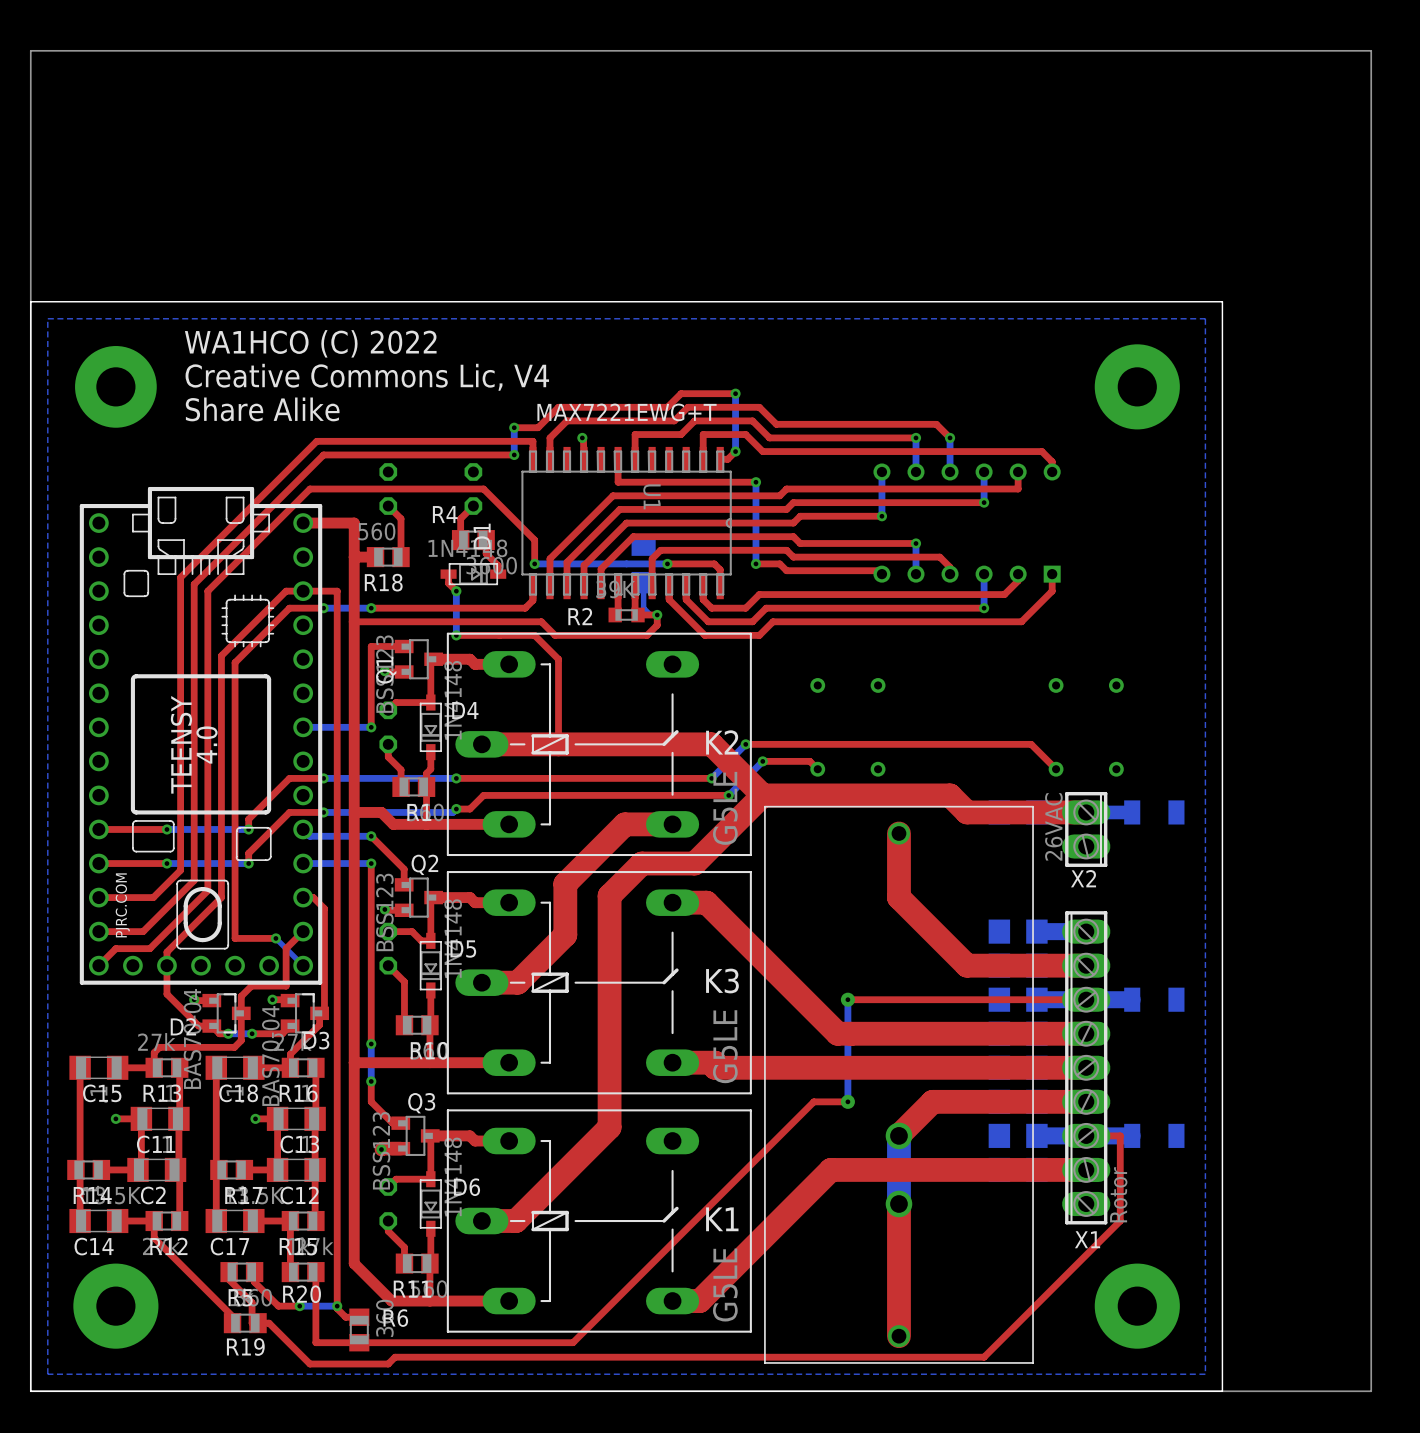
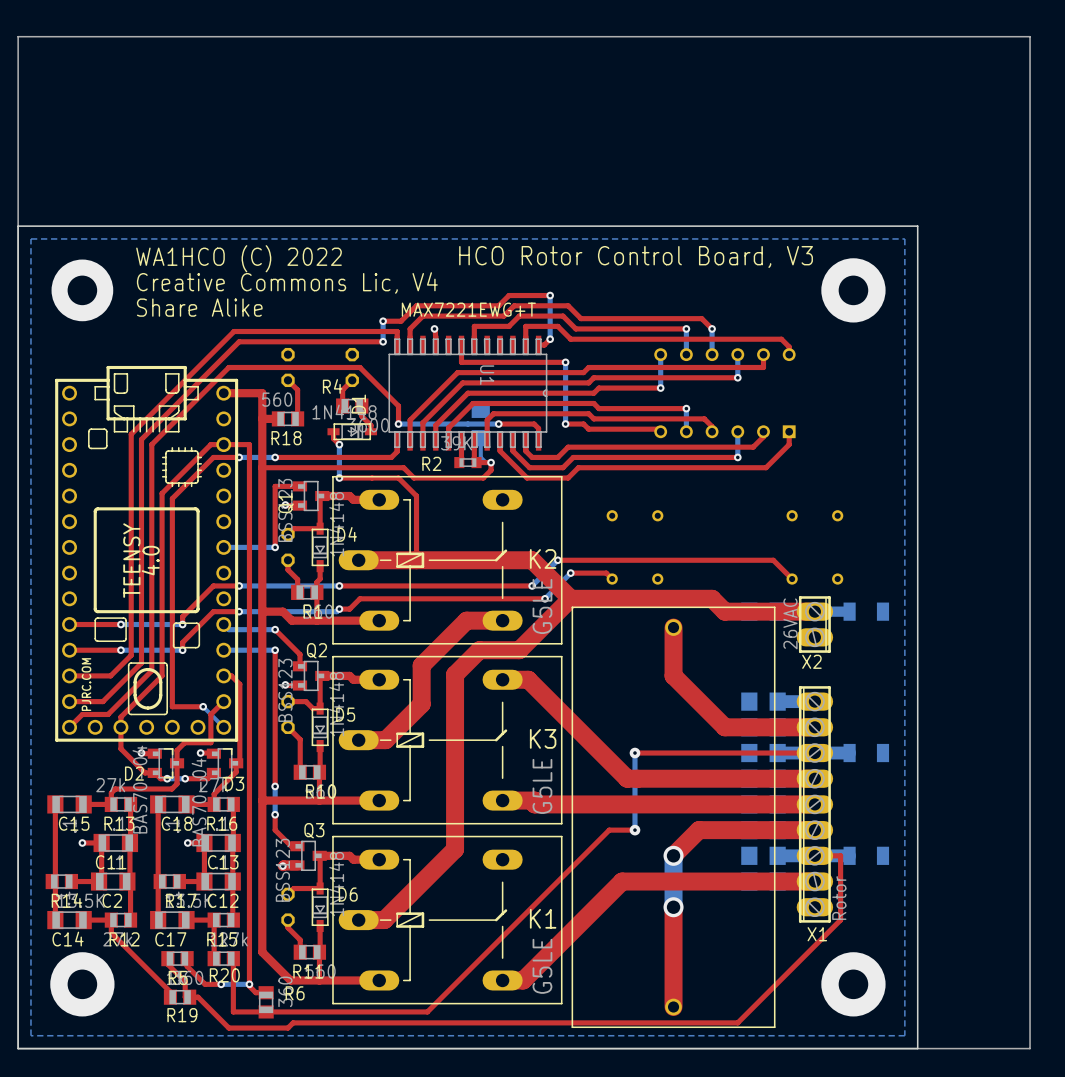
text: none -> HCO Rotor Control Board, V3 (636, 256)

